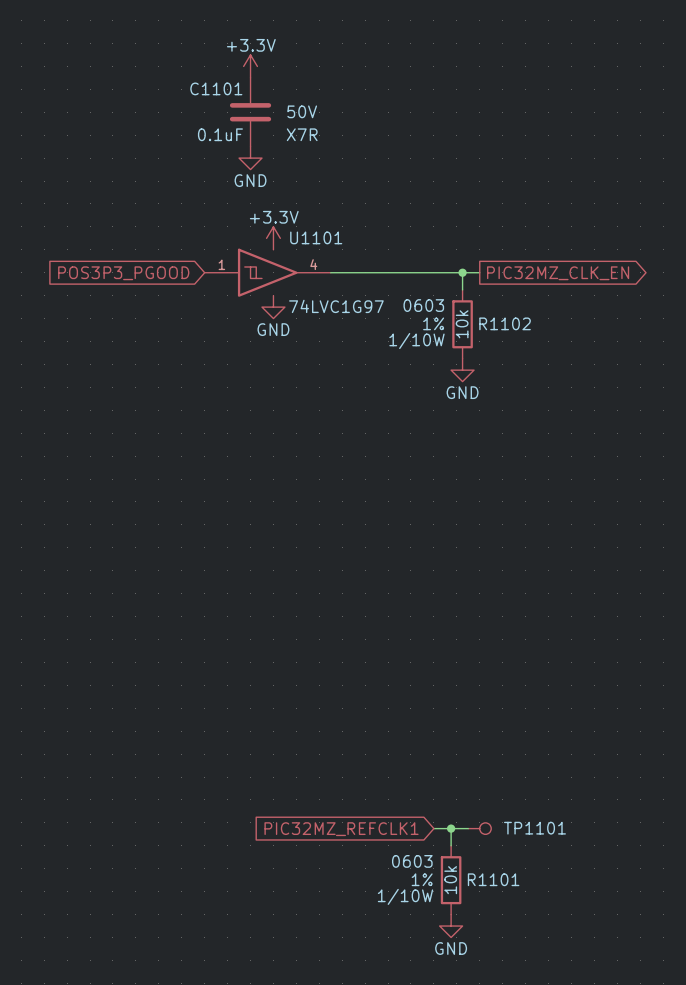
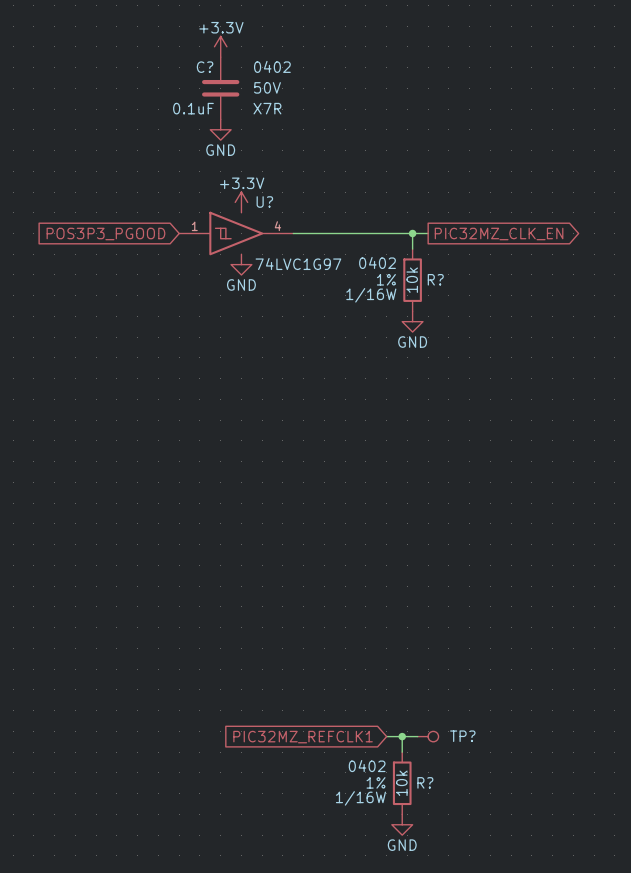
C1101 name: C1101 (216, 88) -> C? (205, 67)
C1101 text: none -> 0402 (272, 66)
U1101 name: U1101 (316, 237) -> U? (264, 201)
R1102 text: 0603 (423, 305) -> 0402 (377, 262)
R1102 name: R1102 (505, 323) -> R? (435, 279)
R1102 text: 1/10W (416, 341) -> 1/16W (371, 295)
TP1101 name: TP1101 (534, 828) -> TP? (462, 736)
R1101 text: 0603 (412, 861) -> 0402 (367, 766)
R1101 name: R1101 (493, 879) -> R? (425, 782)
R1101 text: 1/10W (405, 896) -> 1/16W (360, 798)

